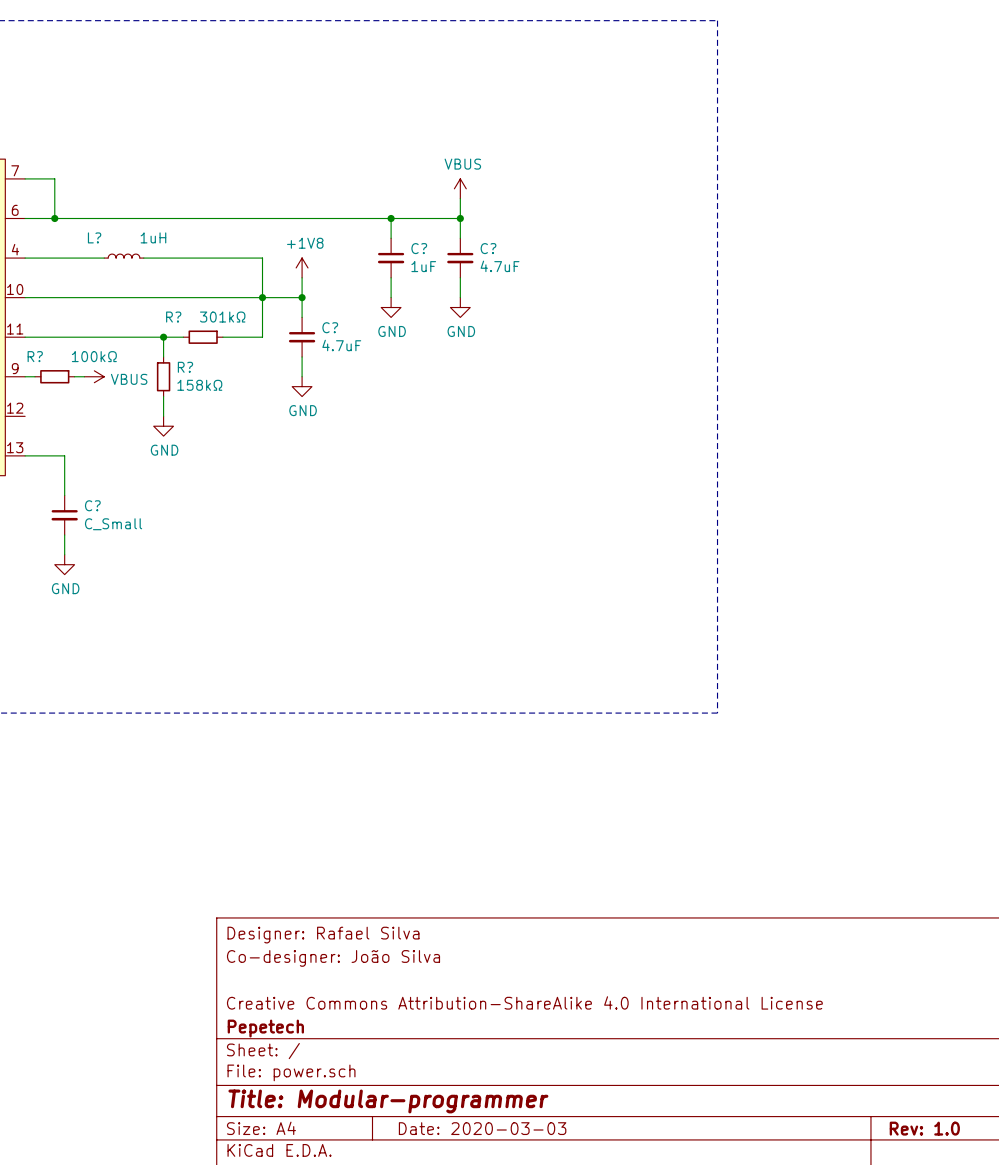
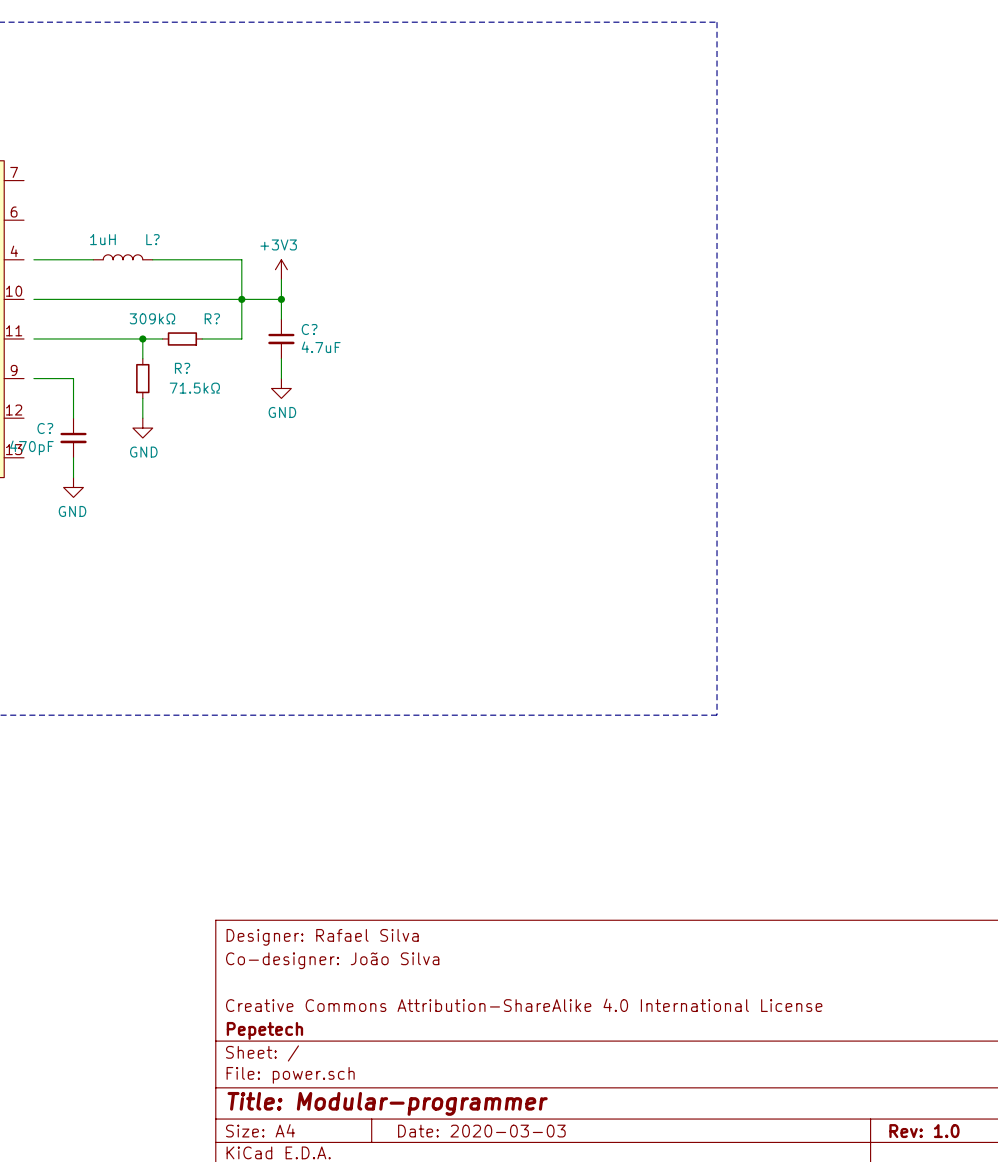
wire: (25, 178) (54, 178) (54, 218) -> none
power symbol: VBUS (460, 188) -> none
wire: (460, 198) (460, 238) -> none
wire: (25, 218) (460, 218) -> none
junction: (54, 218) -> none
wire: (391, 218) (391, 238) -> none
junction: (391, 218) -> none
junction: (460, 218) -> none
L? name position: L? (94, 237) -> L? (152, 239)
L? value position: 1uH (153, 237) -> 1uH (102, 239)
L? symbol: [104, 254, 144, 259] -> [93, 254, 153, 260]
wire: (25, 258) (35, 258) -> none
wire: (242, 258) (262, 258) (262, 337) (242, 337) -> (241, 259) (241, 338)
C?: 1uF (391, 258) -> none
C?: 4.7uF (460, 258) -> none
power symbol: none -> +3V3 (281, 269)
power symbol: +1V8 (302, 267) -> none
wire: (302, 277) (302, 317) -> (281, 279) (281, 319)
wire: (391, 277) (391, 297) -> none
wire: (460, 277) (460, 297) -> none
wire: (25, 297) (35, 297) -> none
junction: none -> (241, 299)
junction: (262, 297) -> none
wire: (282, 297) (302, 297) -> (202, 338) (222, 338)
junction: none -> (281, 299)
junction: (302, 297) -> none
power symbol: GND (391, 307) -> none
power symbol: GND (460, 307) -> none
wire: (25, 337) (35, 337) -> none
wire: none -> (142, 338) (142, 358)
junction position: (163, 337) -> (142, 338)
wire: (183, 337) (163, 337) (163, 356) -> none
R?: none -> 309kΩ (182, 338)
R?: 301kΩ (203, 337) -> none
C? position: (302, 337) -> (281, 338)
wire: (302, 356) (302, 376) -> (281, 358) (281, 378)
wire: (25, 376) (35, 376) -> (73, 418) (73, 378) (33, 378)
R?: 100kΩ (54, 376) -> none
wire: (74, 376) (84, 376) -> none
power symbol: VBUS (94, 376) -> none
R?: none -> 71.5kΩ (142, 378)
R?: 158kΩ (163, 376) -> none
power symbol position: GND (302, 386) -> GND (281, 388)
wire: (163, 396) (163, 416) -> (142, 398) (142, 418)
power symbol position: GND (163, 426) -> GND (142, 428)
C?: none -> 470pF (73, 437)
wire: (25, 455) (64, 455) (64, 495) -> none
power symbol: none -> GND (73, 487)
C?: C_Small (64, 515) -> none
wire: (64, 535) (64, 554) -> (73, 457) (73, 477)
power symbol: GND (64, 564) -> none

